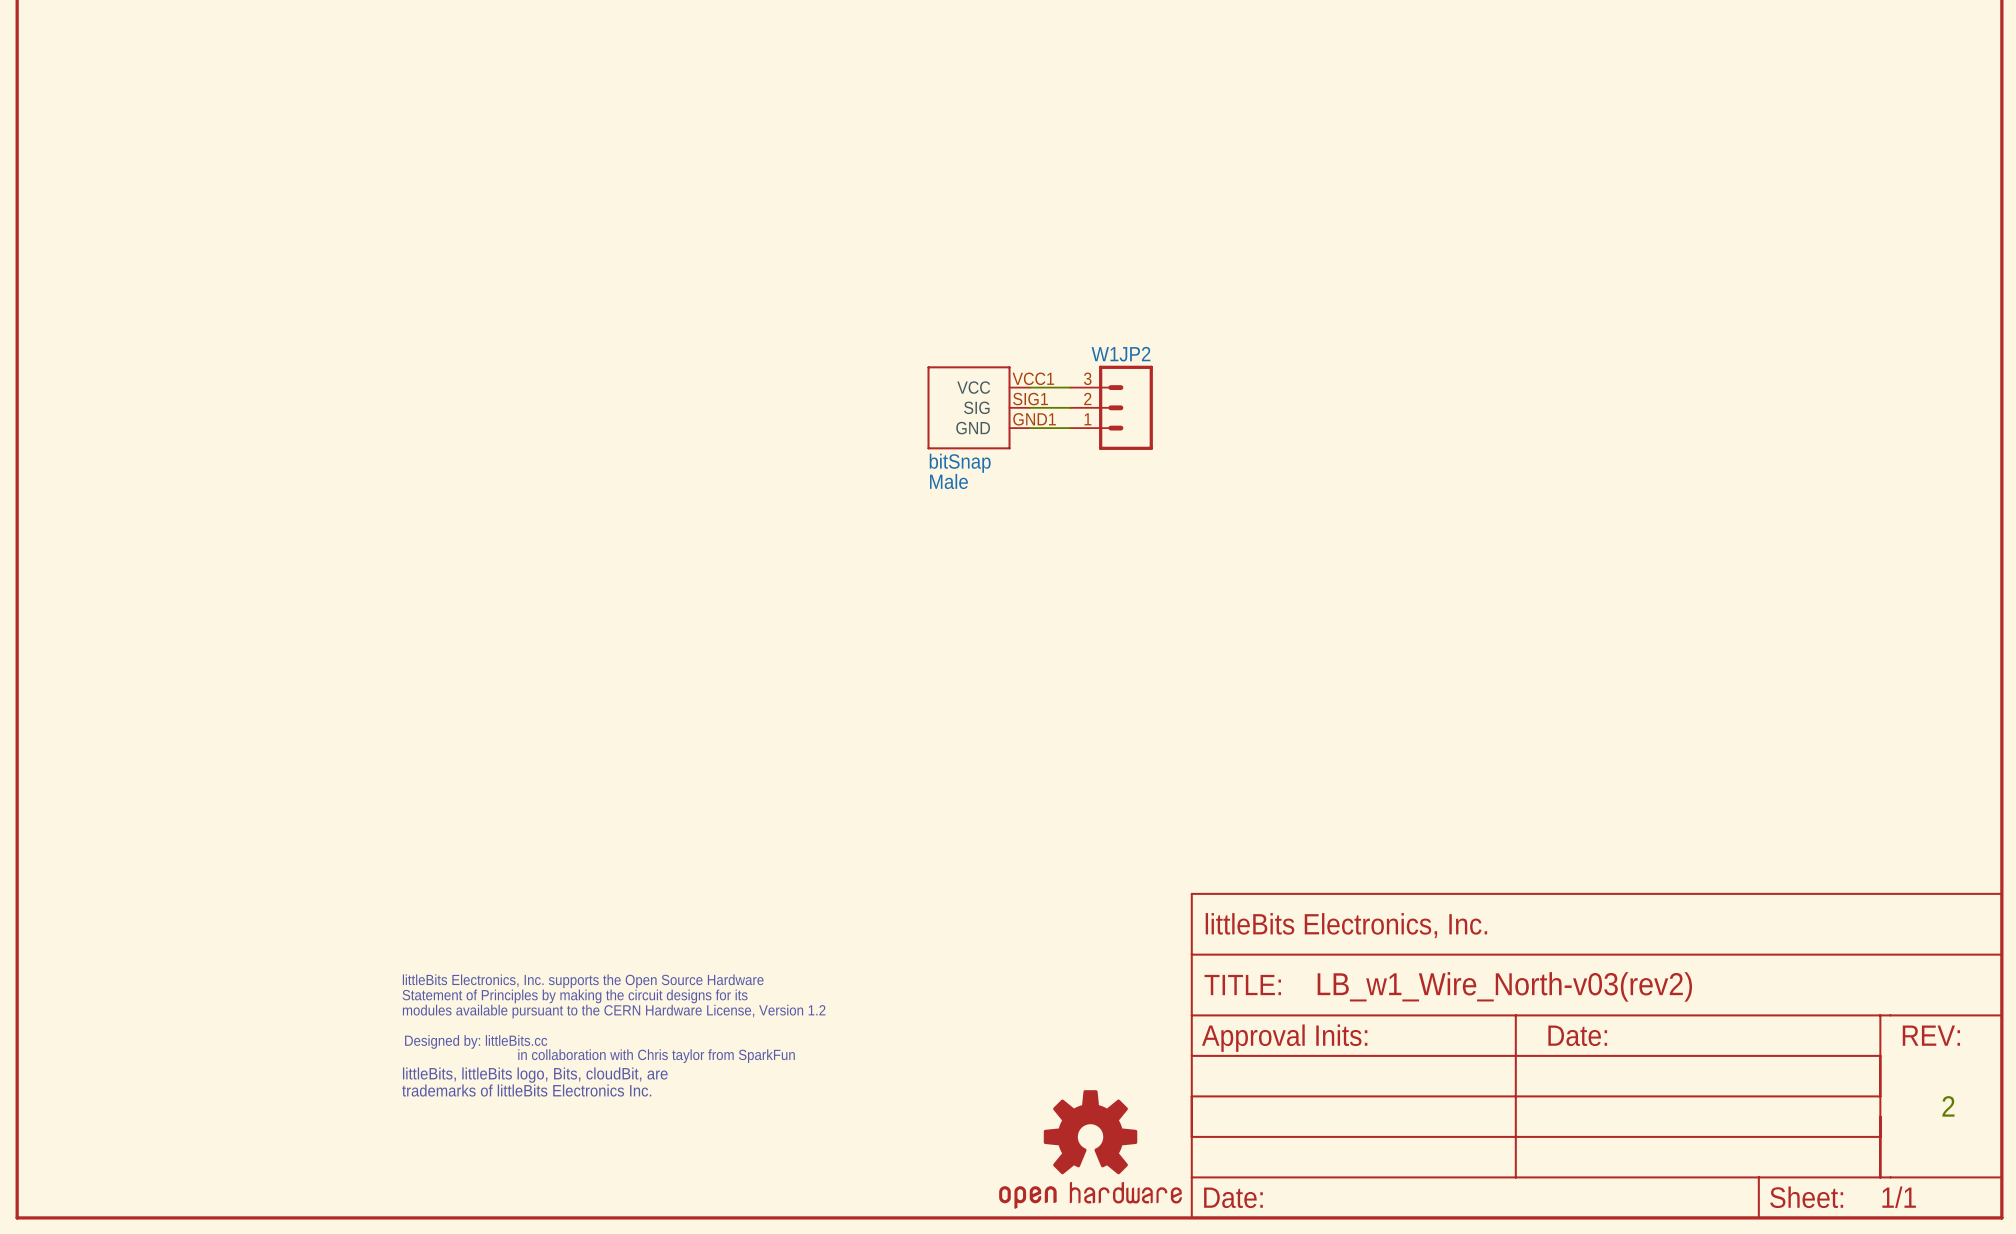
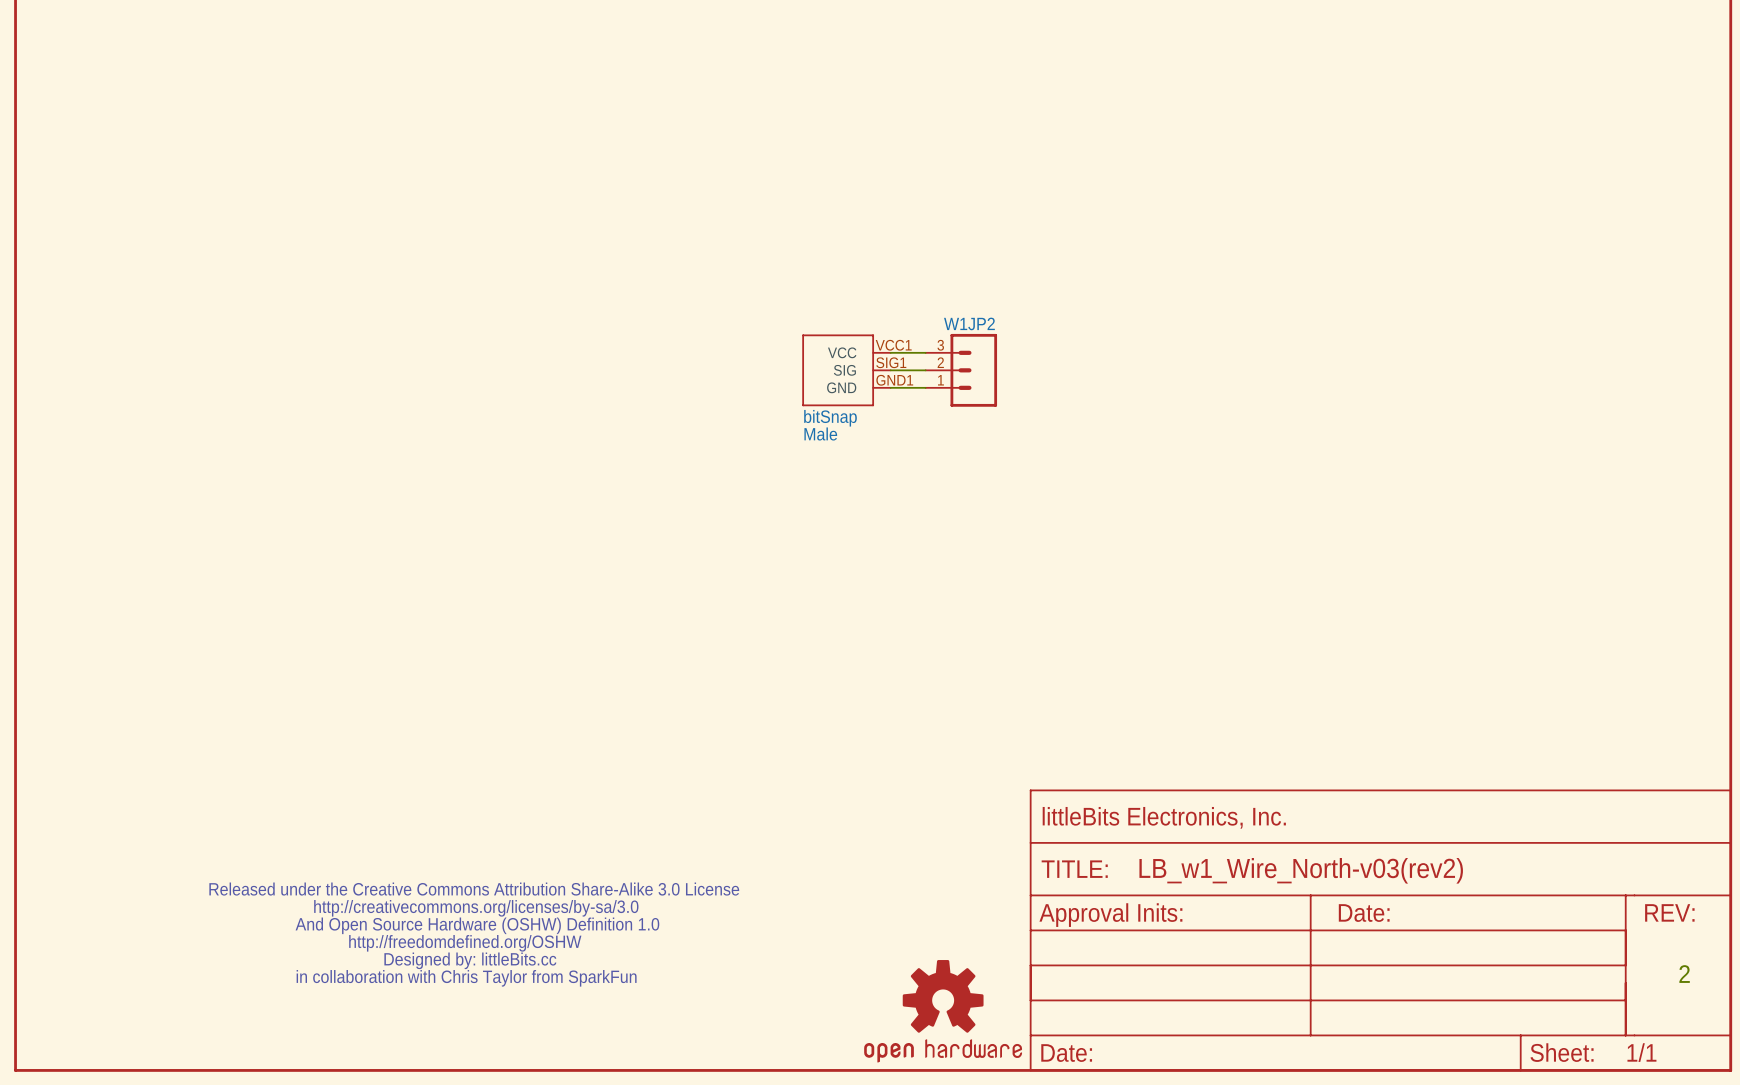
part: (613, 1035) -> none
text: in collaboration with Chris taylor from SparkFun (656, 1056) -> none
part: none -> (474, 934)

